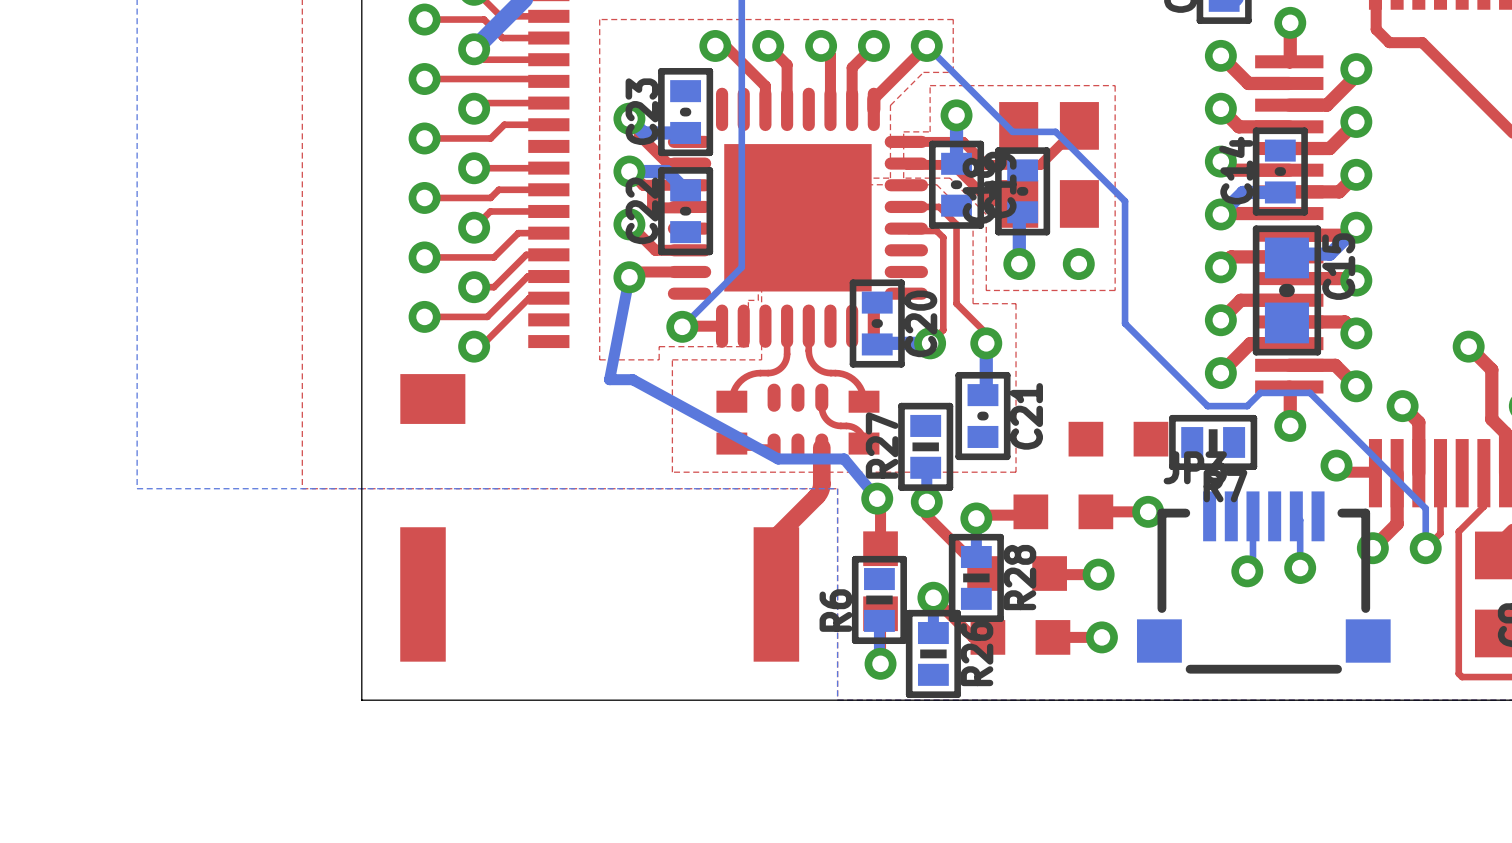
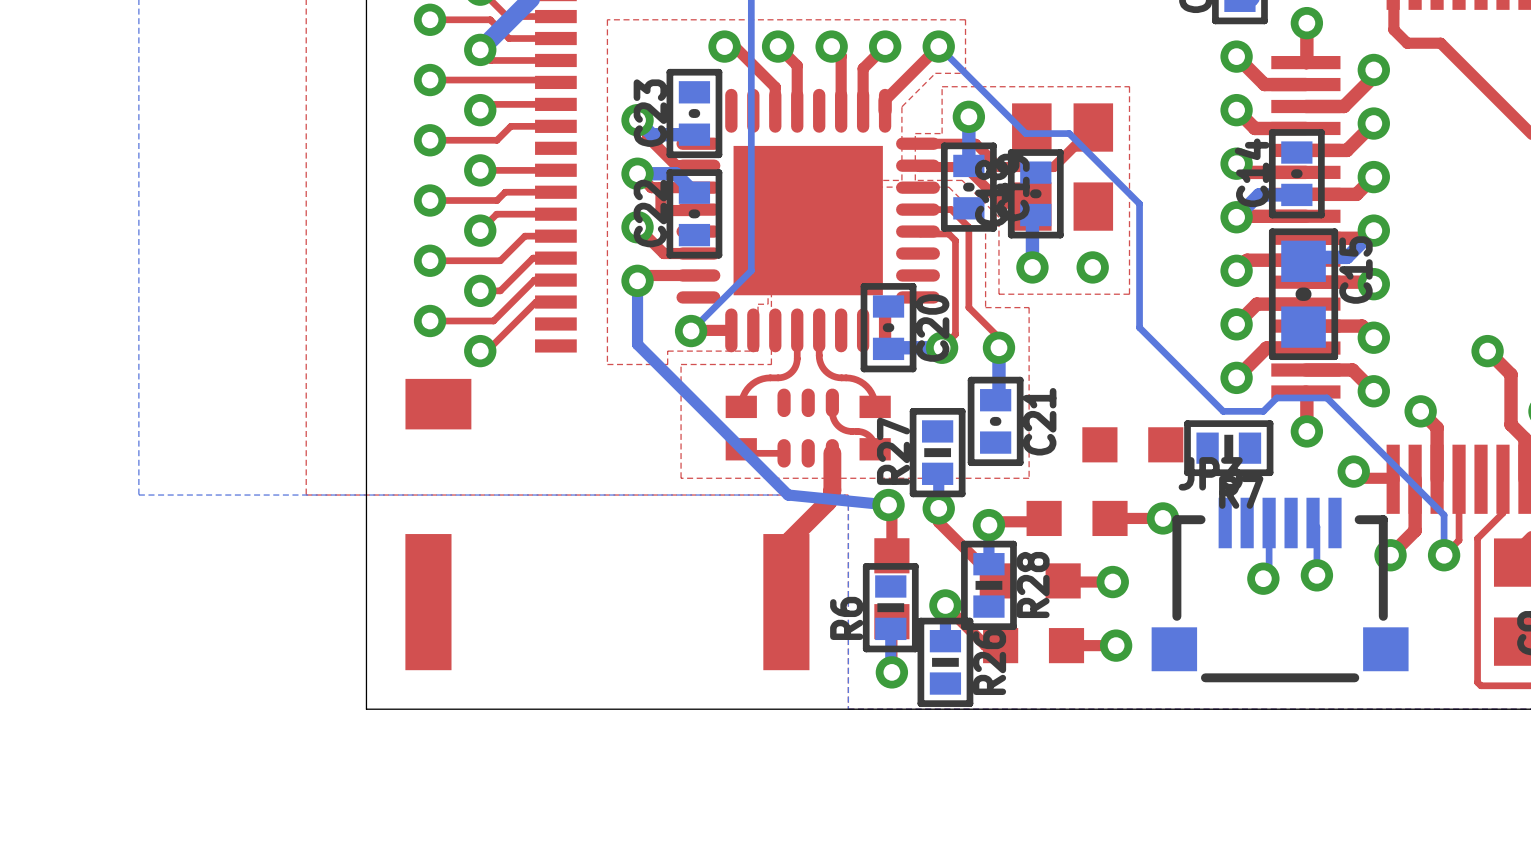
bottom track: (629, 277) (609, 379) (632, 379) (778, 458) (844, 458) (877, 498) -> (637, 280) (637, 344) (788, 495) (888, 505)

